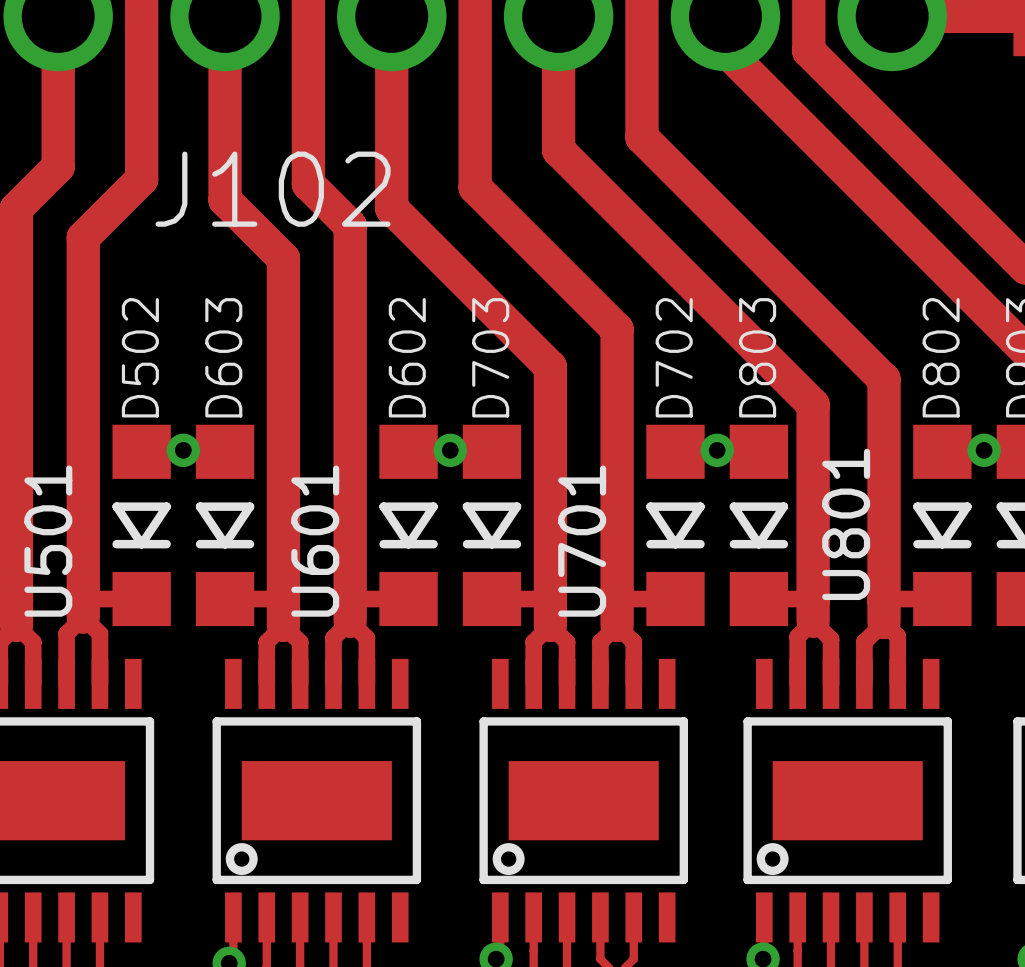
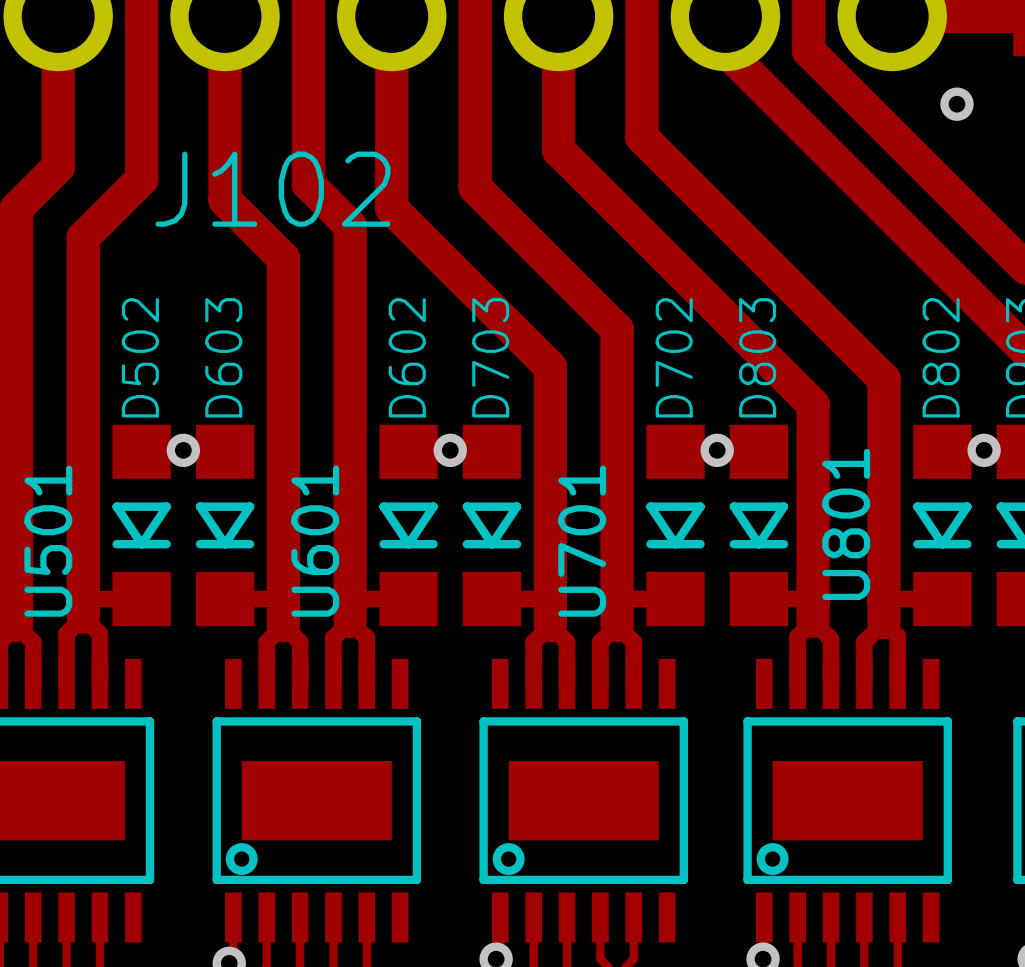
via: none -> (956, 104)

